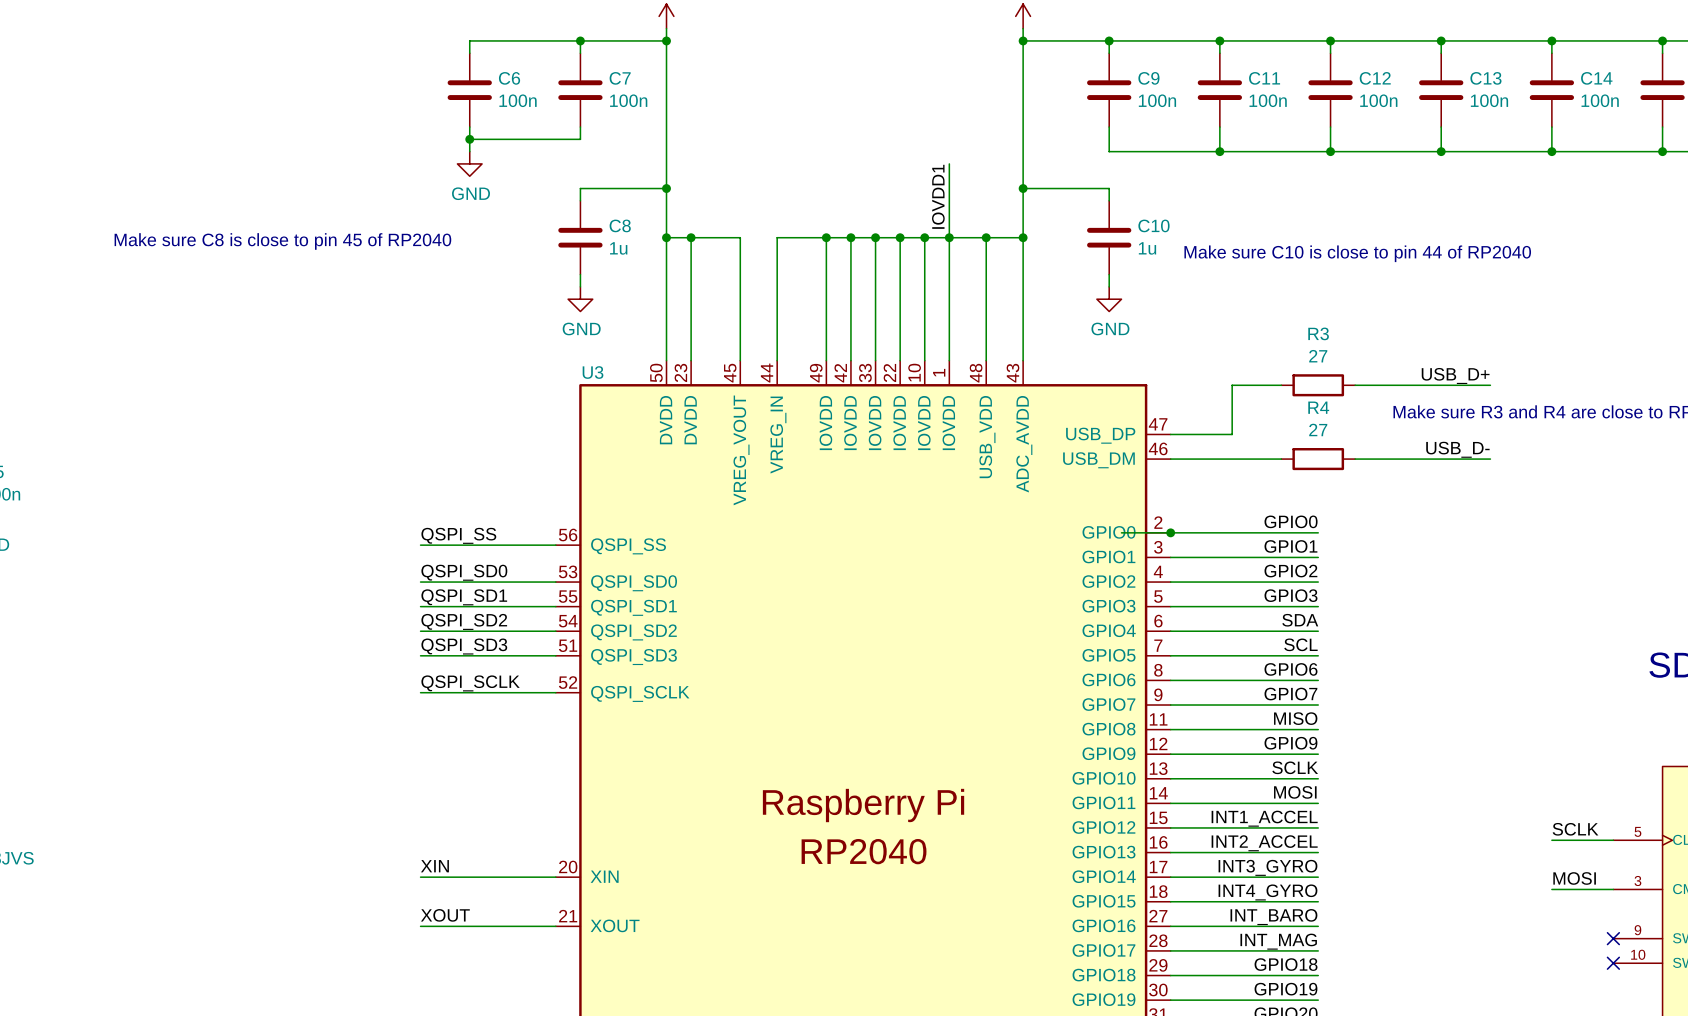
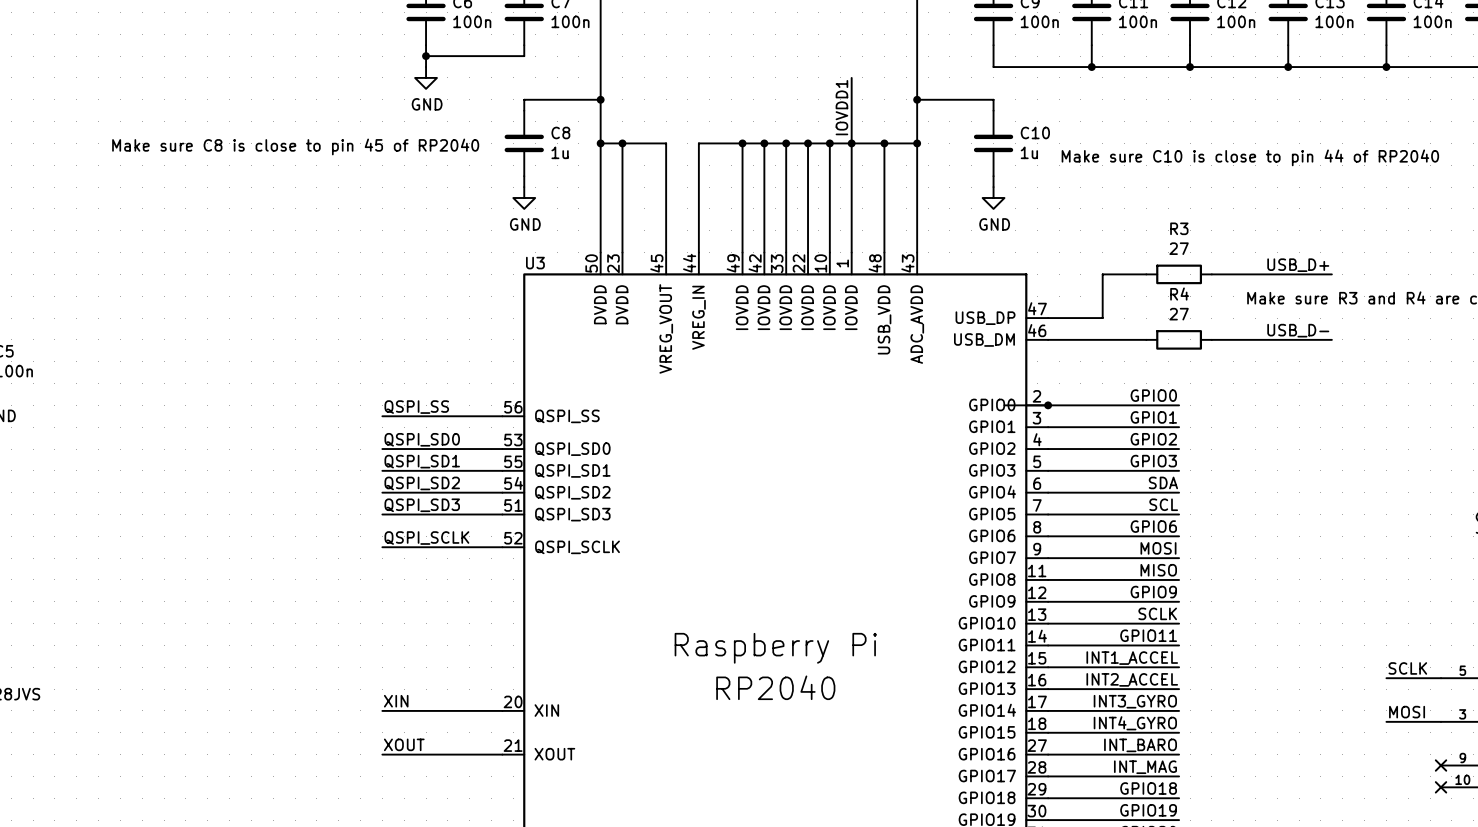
label: GPIO7 (1290, 694) -> MOSI (1158, 548)
label: MOSI (1295, 792) -> GPIO11 (1148, 635)

